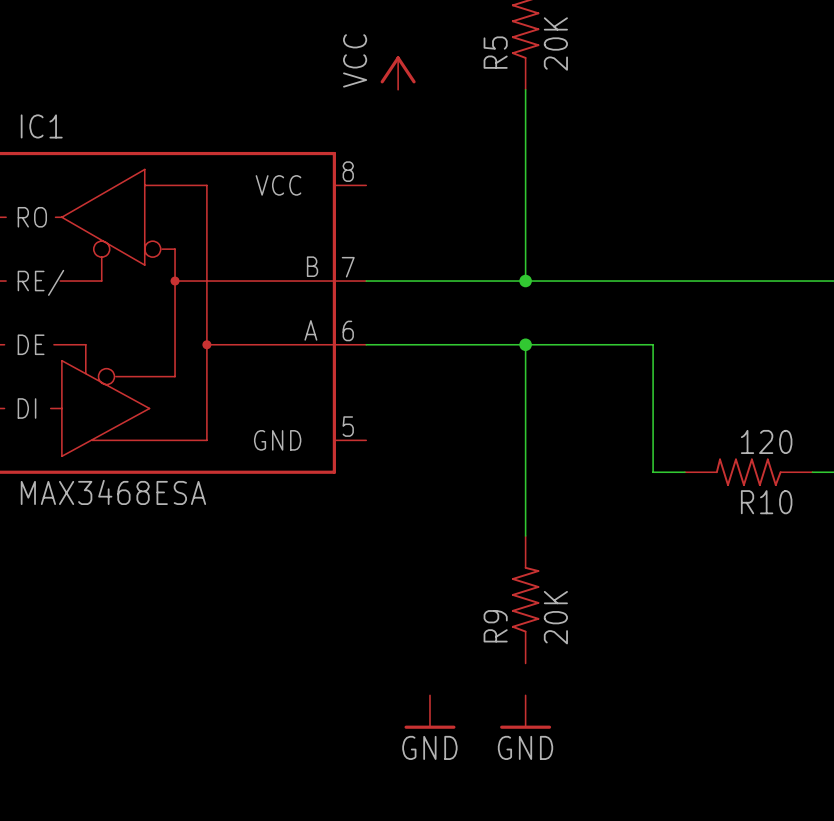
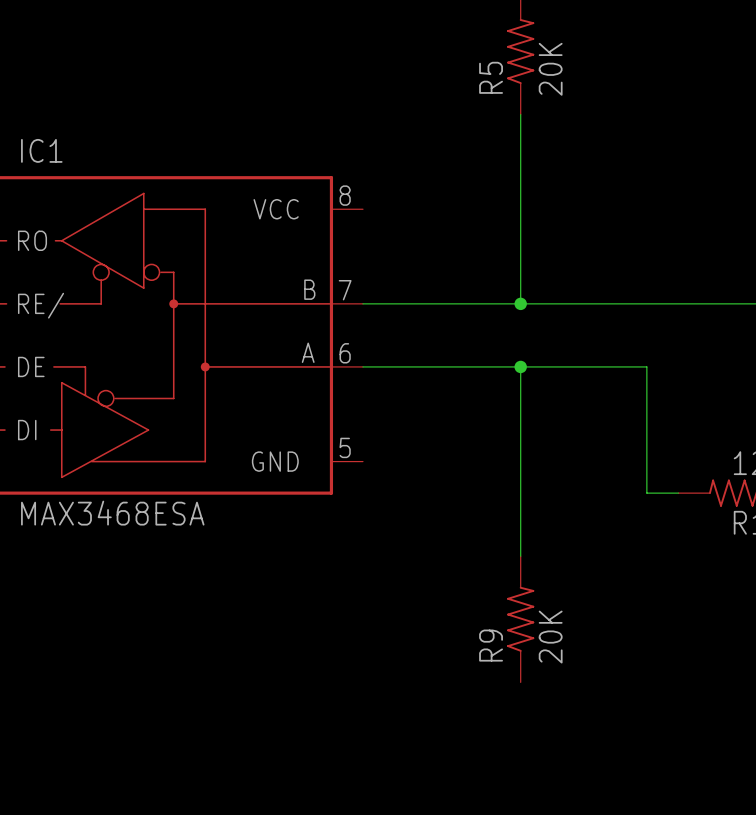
power symbol: VCC (398, 73) -> none
power symbol: GND (429, 712) -> none
power symbol: GND (525, 712) -> none

